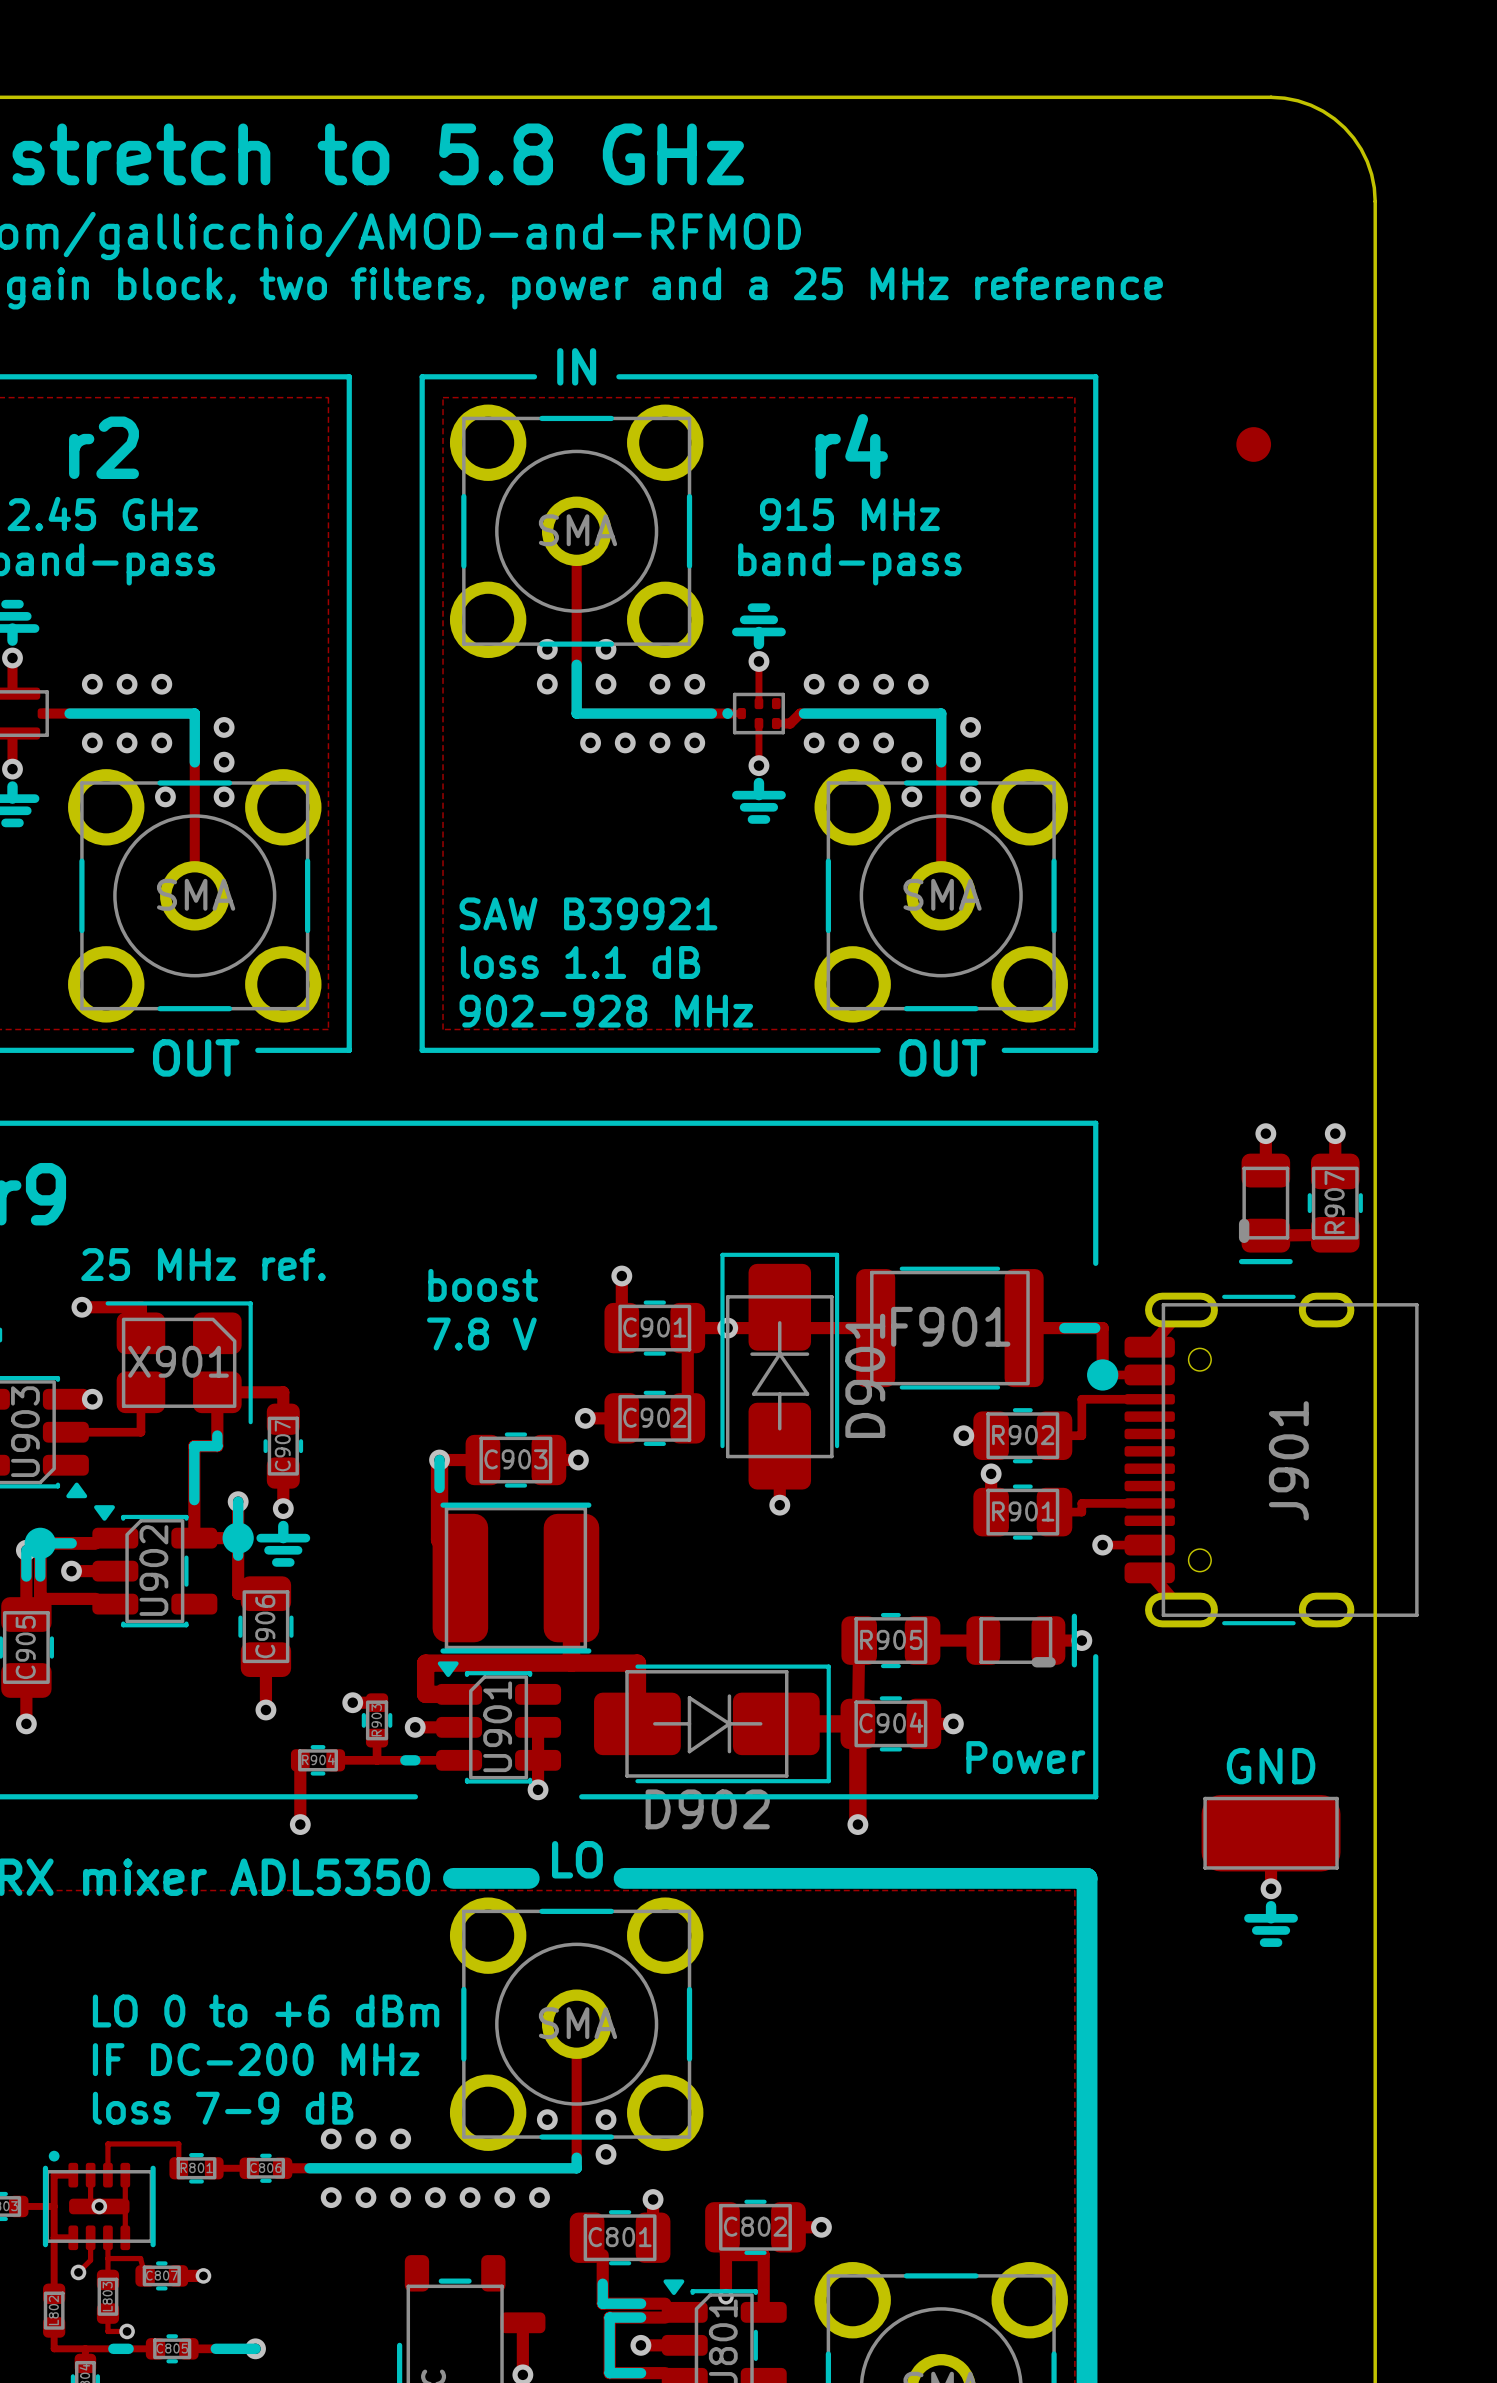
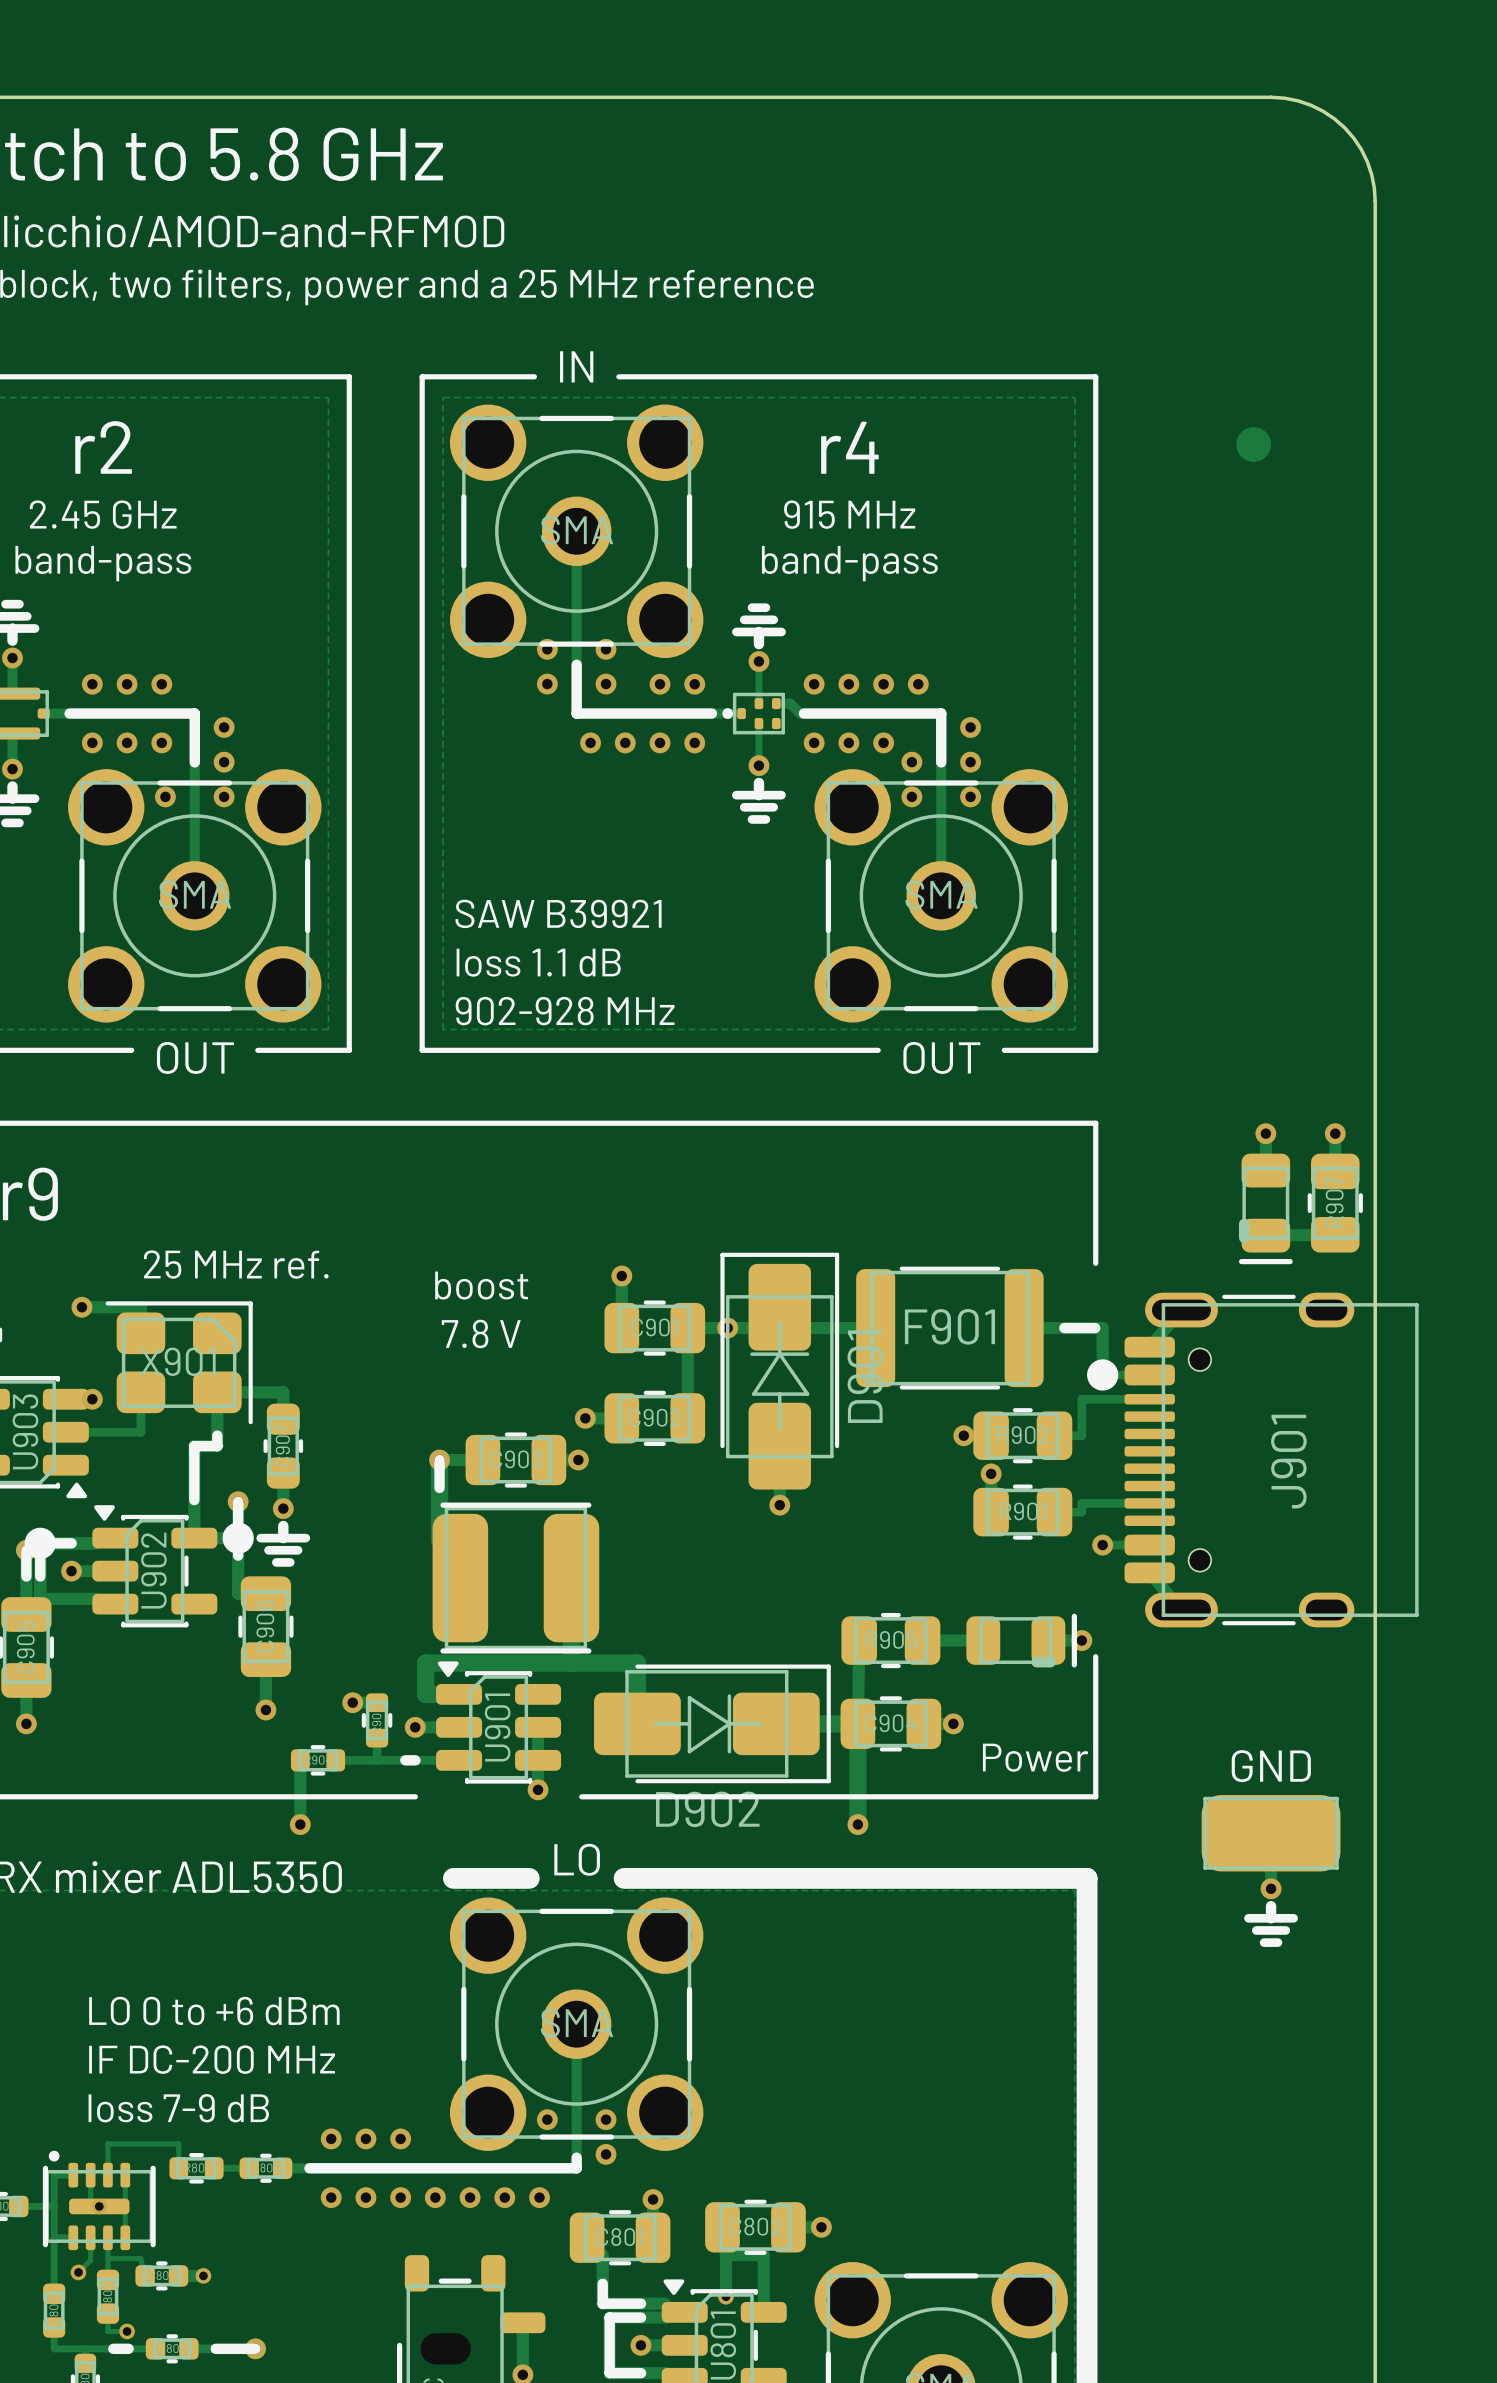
track: (800, 713) (790, 723) (776, 723) -> (800, 713) (790, 703) (776, 703)

